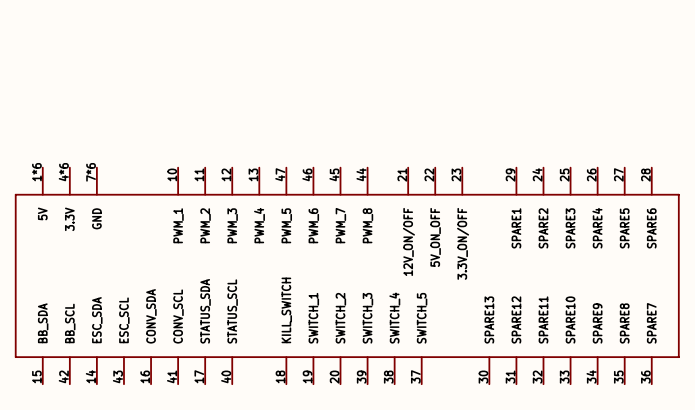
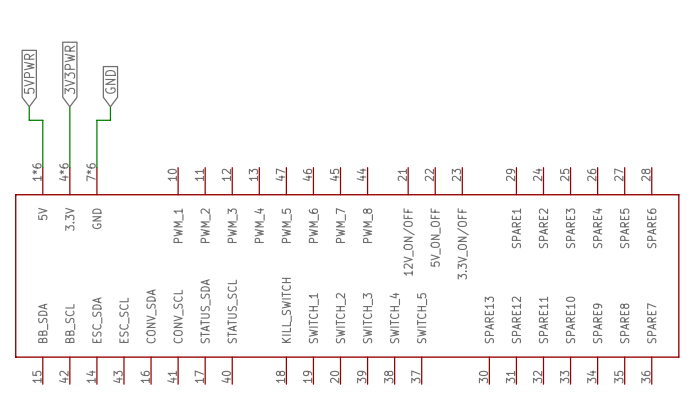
global label: none -> 3V3PWR (69, 69)
global label: none -> 5VPWR (29, 73)
global label: none -> GND (110, 81)
wire: none -> (29, 106) (29, 120) (42, 120) (42, 167)
wire: none -> (69, 106) (69, 167)
wire: none -> (110, 106) (110, 120) (96, 120) (96, 167)

